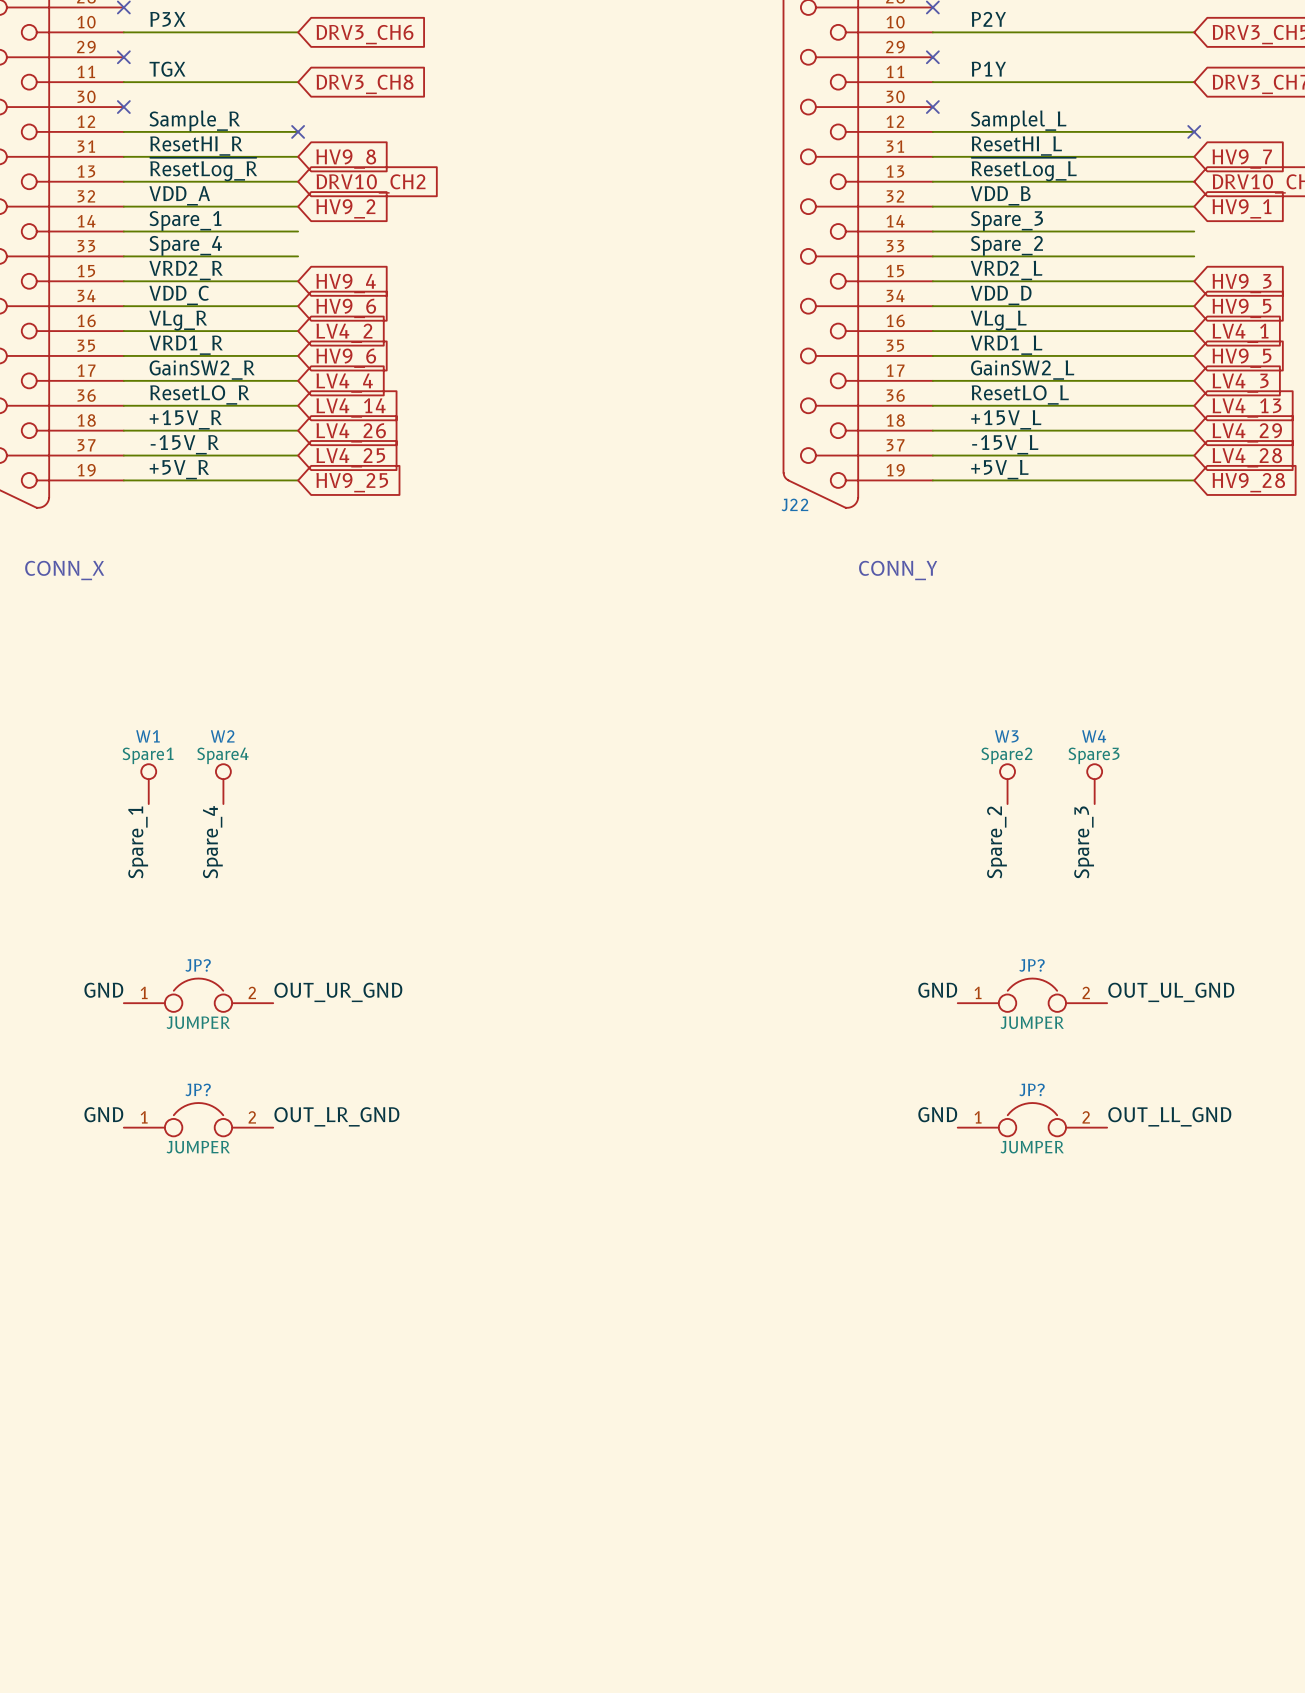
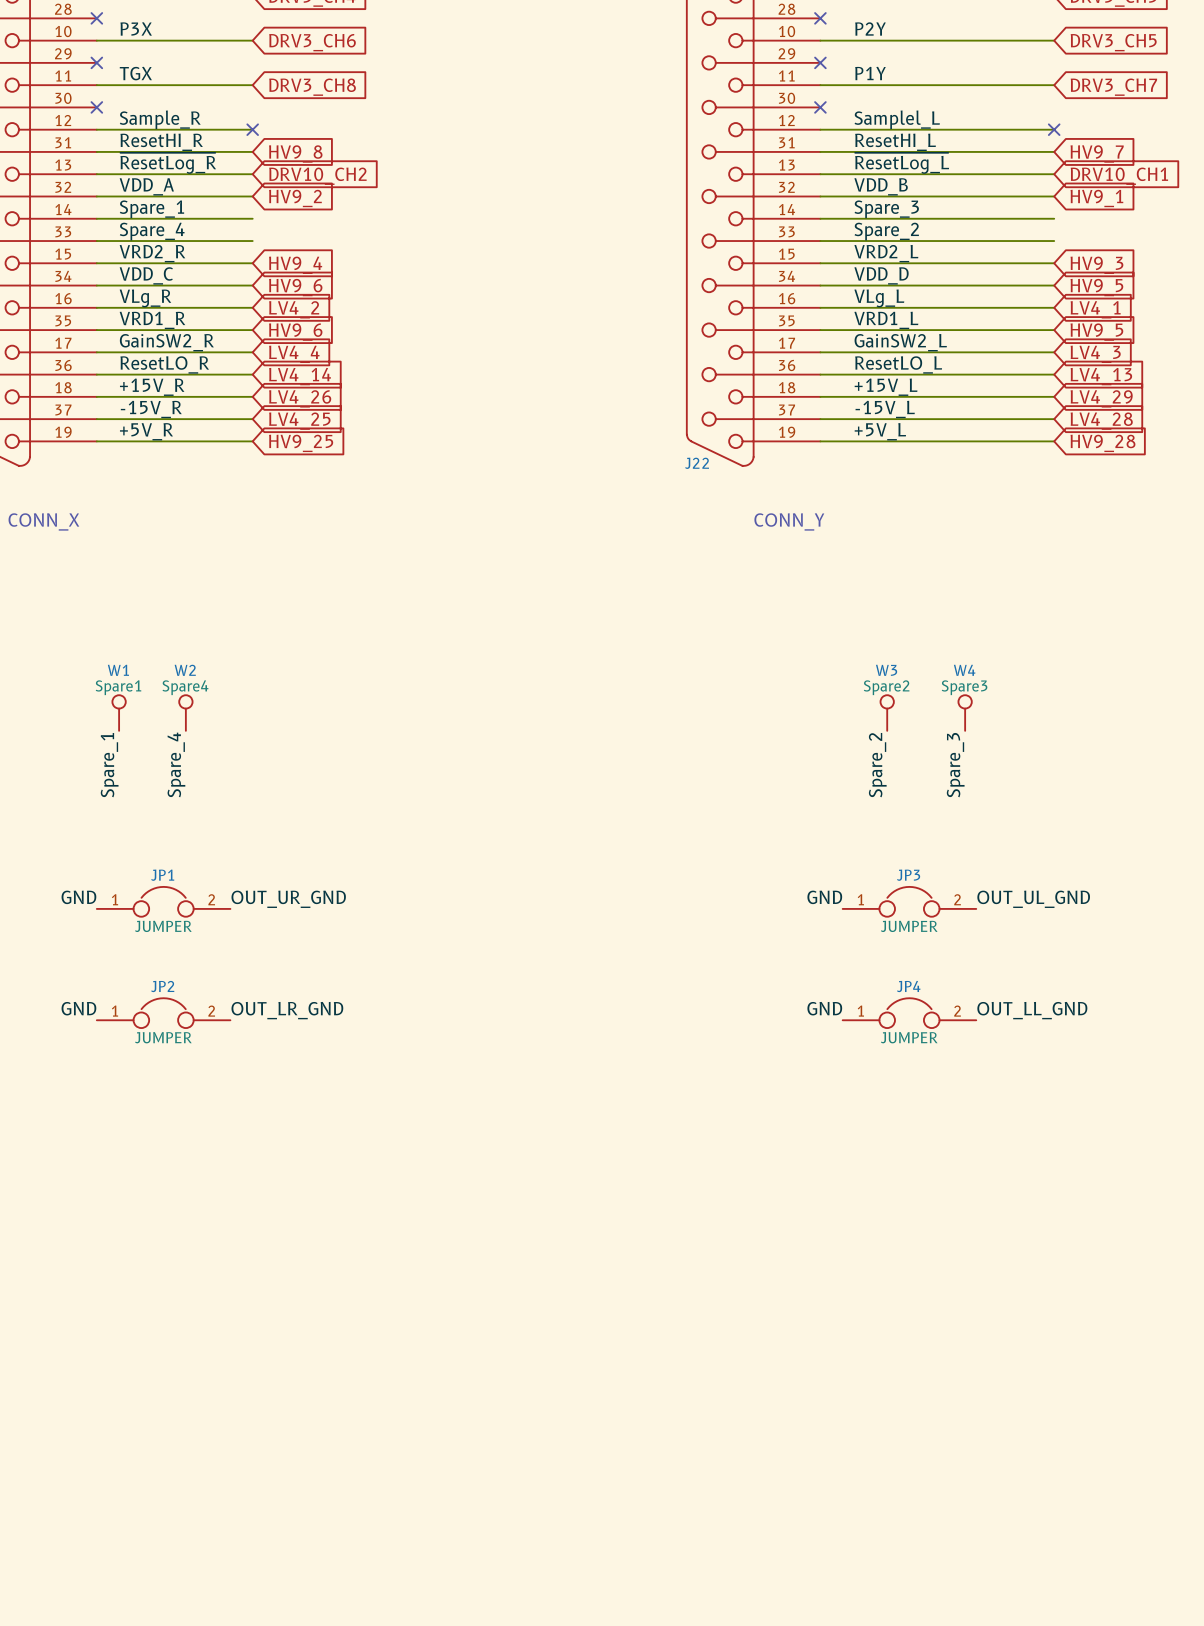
JP? name: JP? (198, 965) -> JP1 (162, 875)
JP? name: JP? (1032, 965) -> JP3 (908, 875)
JP? name: JP? (198, 1089) -> JP2 (162, 986)
JP? name: JP? (1032, 1089) -> JP4 (908, 986)

